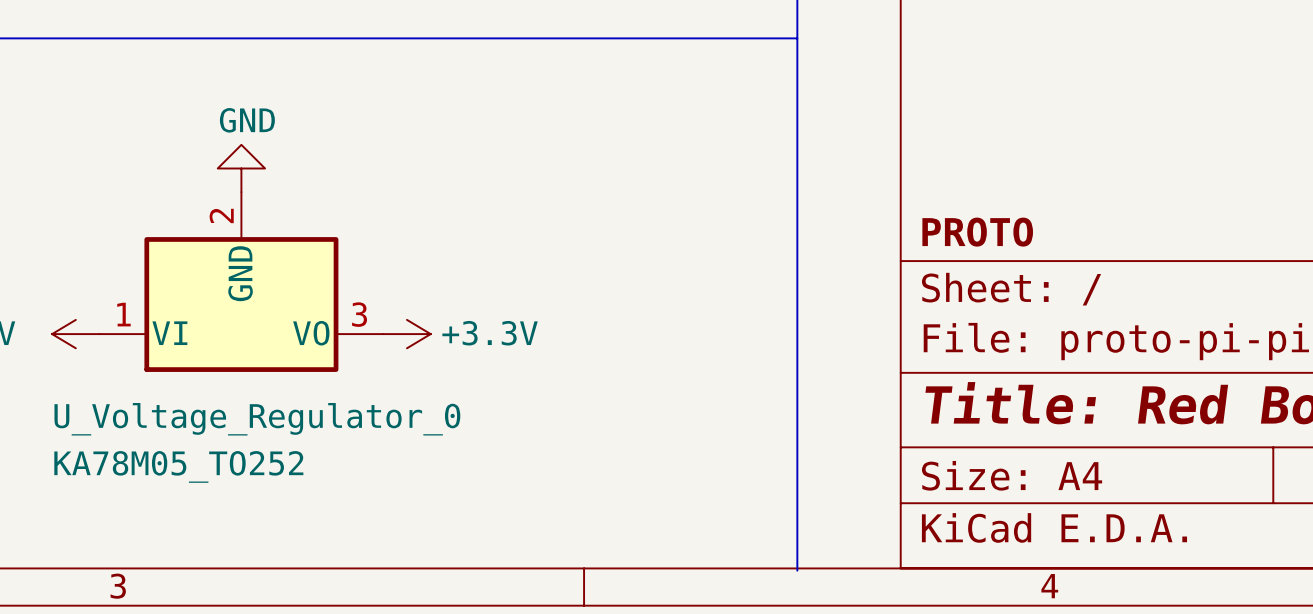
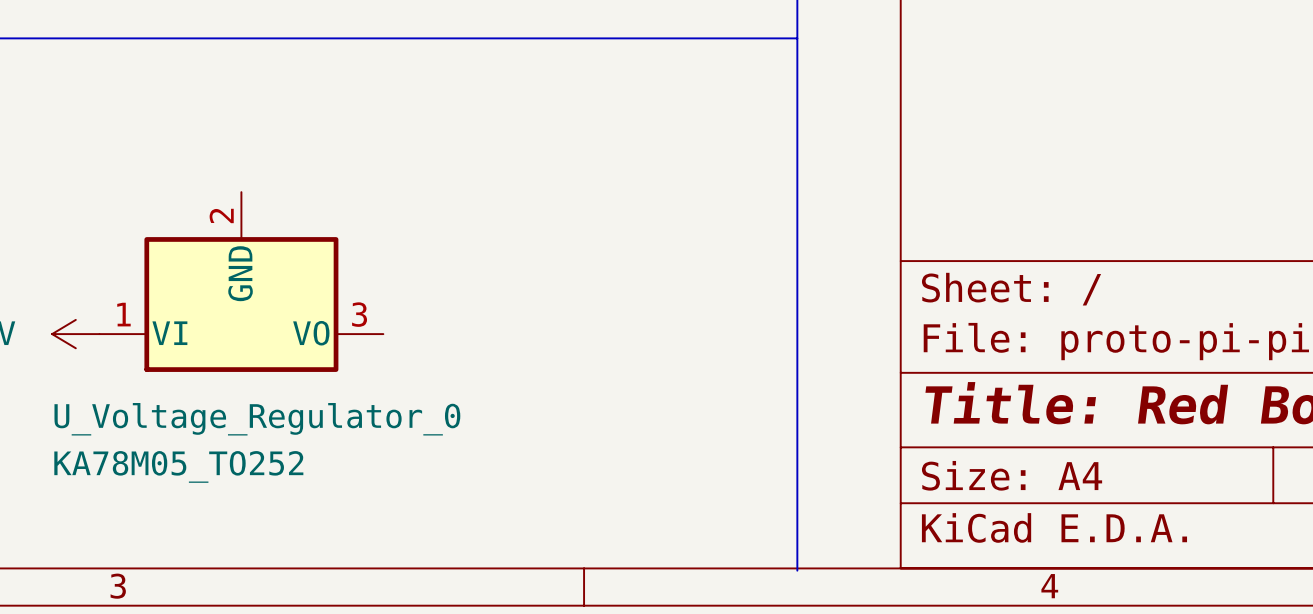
power symbol: GND (241, 168) -> none
title block: PROTO (977, 232) -> none
power symbol: +3.3V (407, 334) -> none

